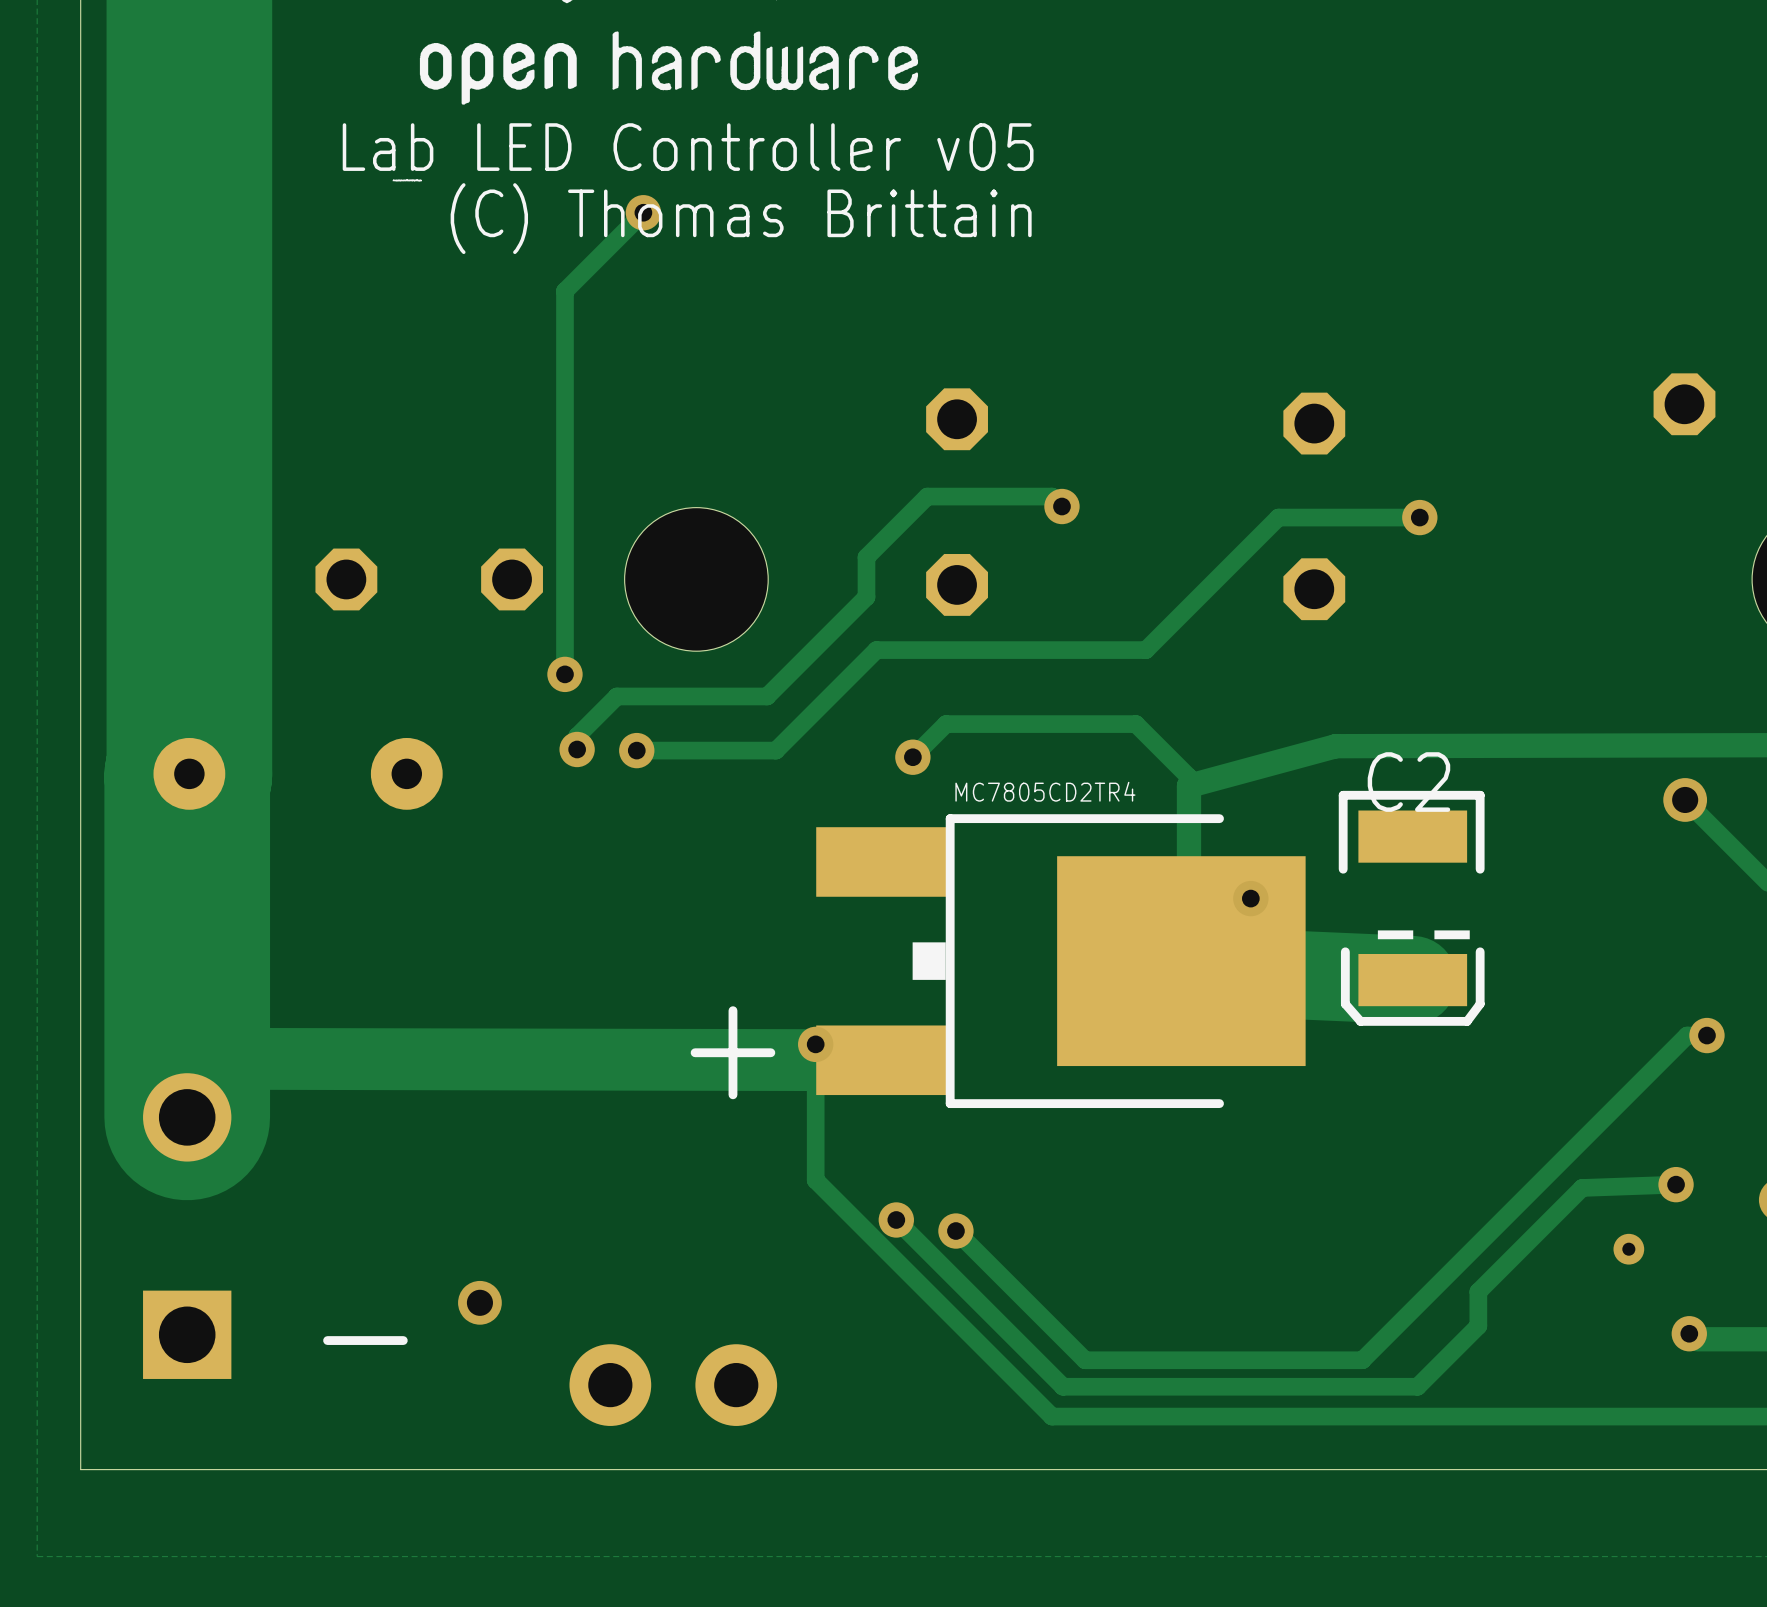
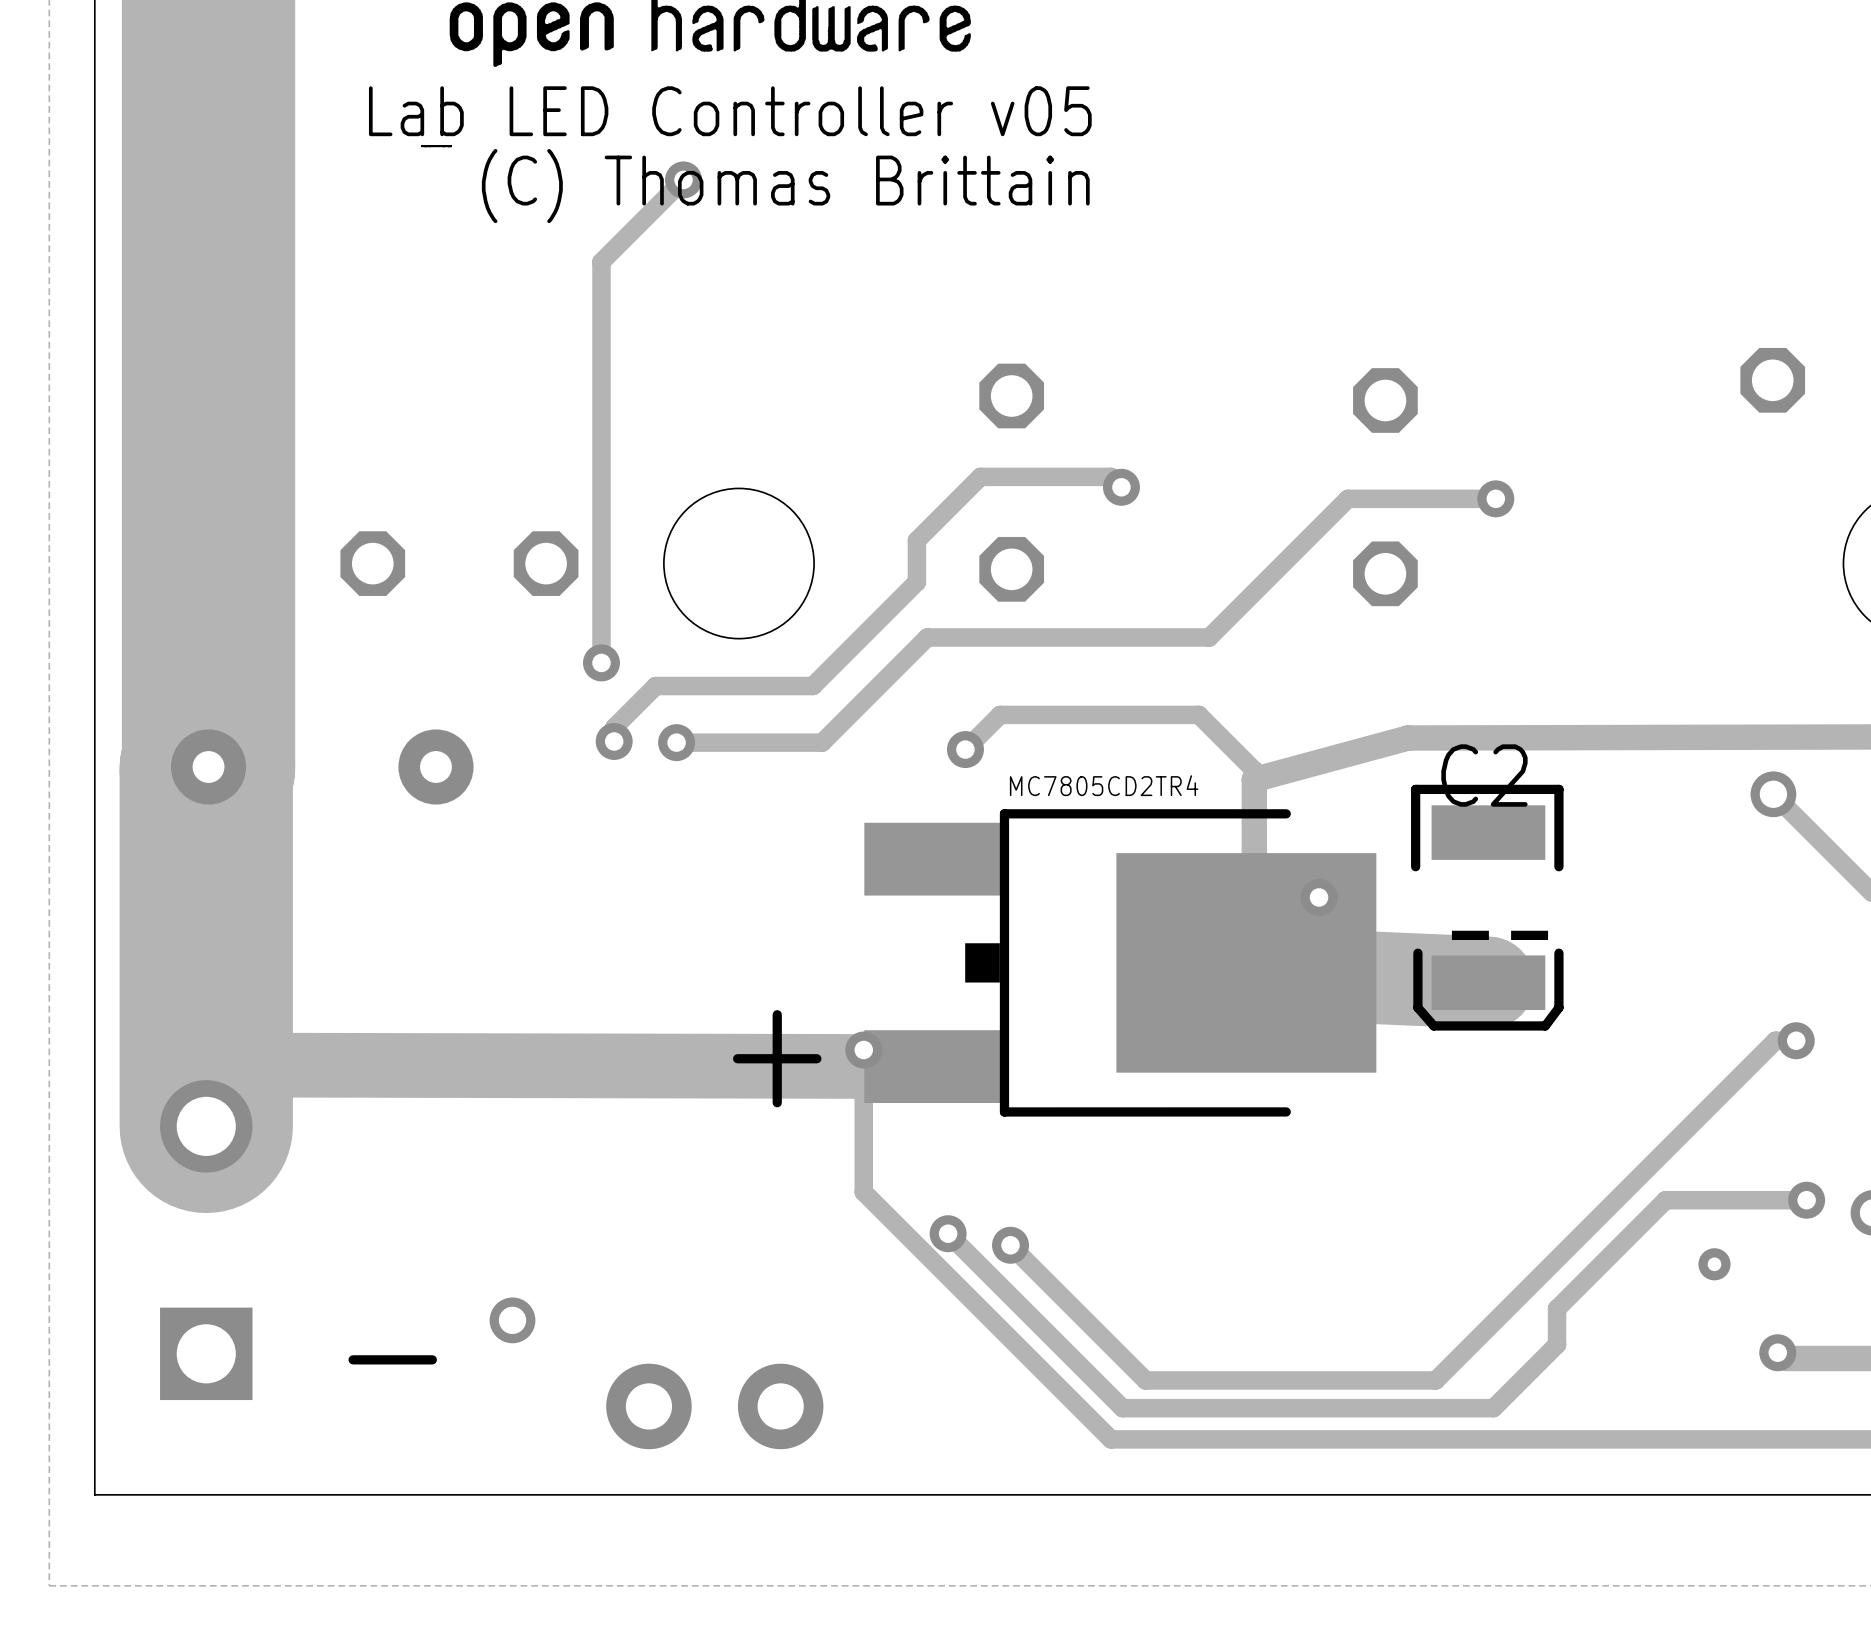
track: (1676, 1184) (1582, 1187) -> (1806, 1200) (1665, 1200)
via position: (1676, 1184) -> (1806, 1200)

